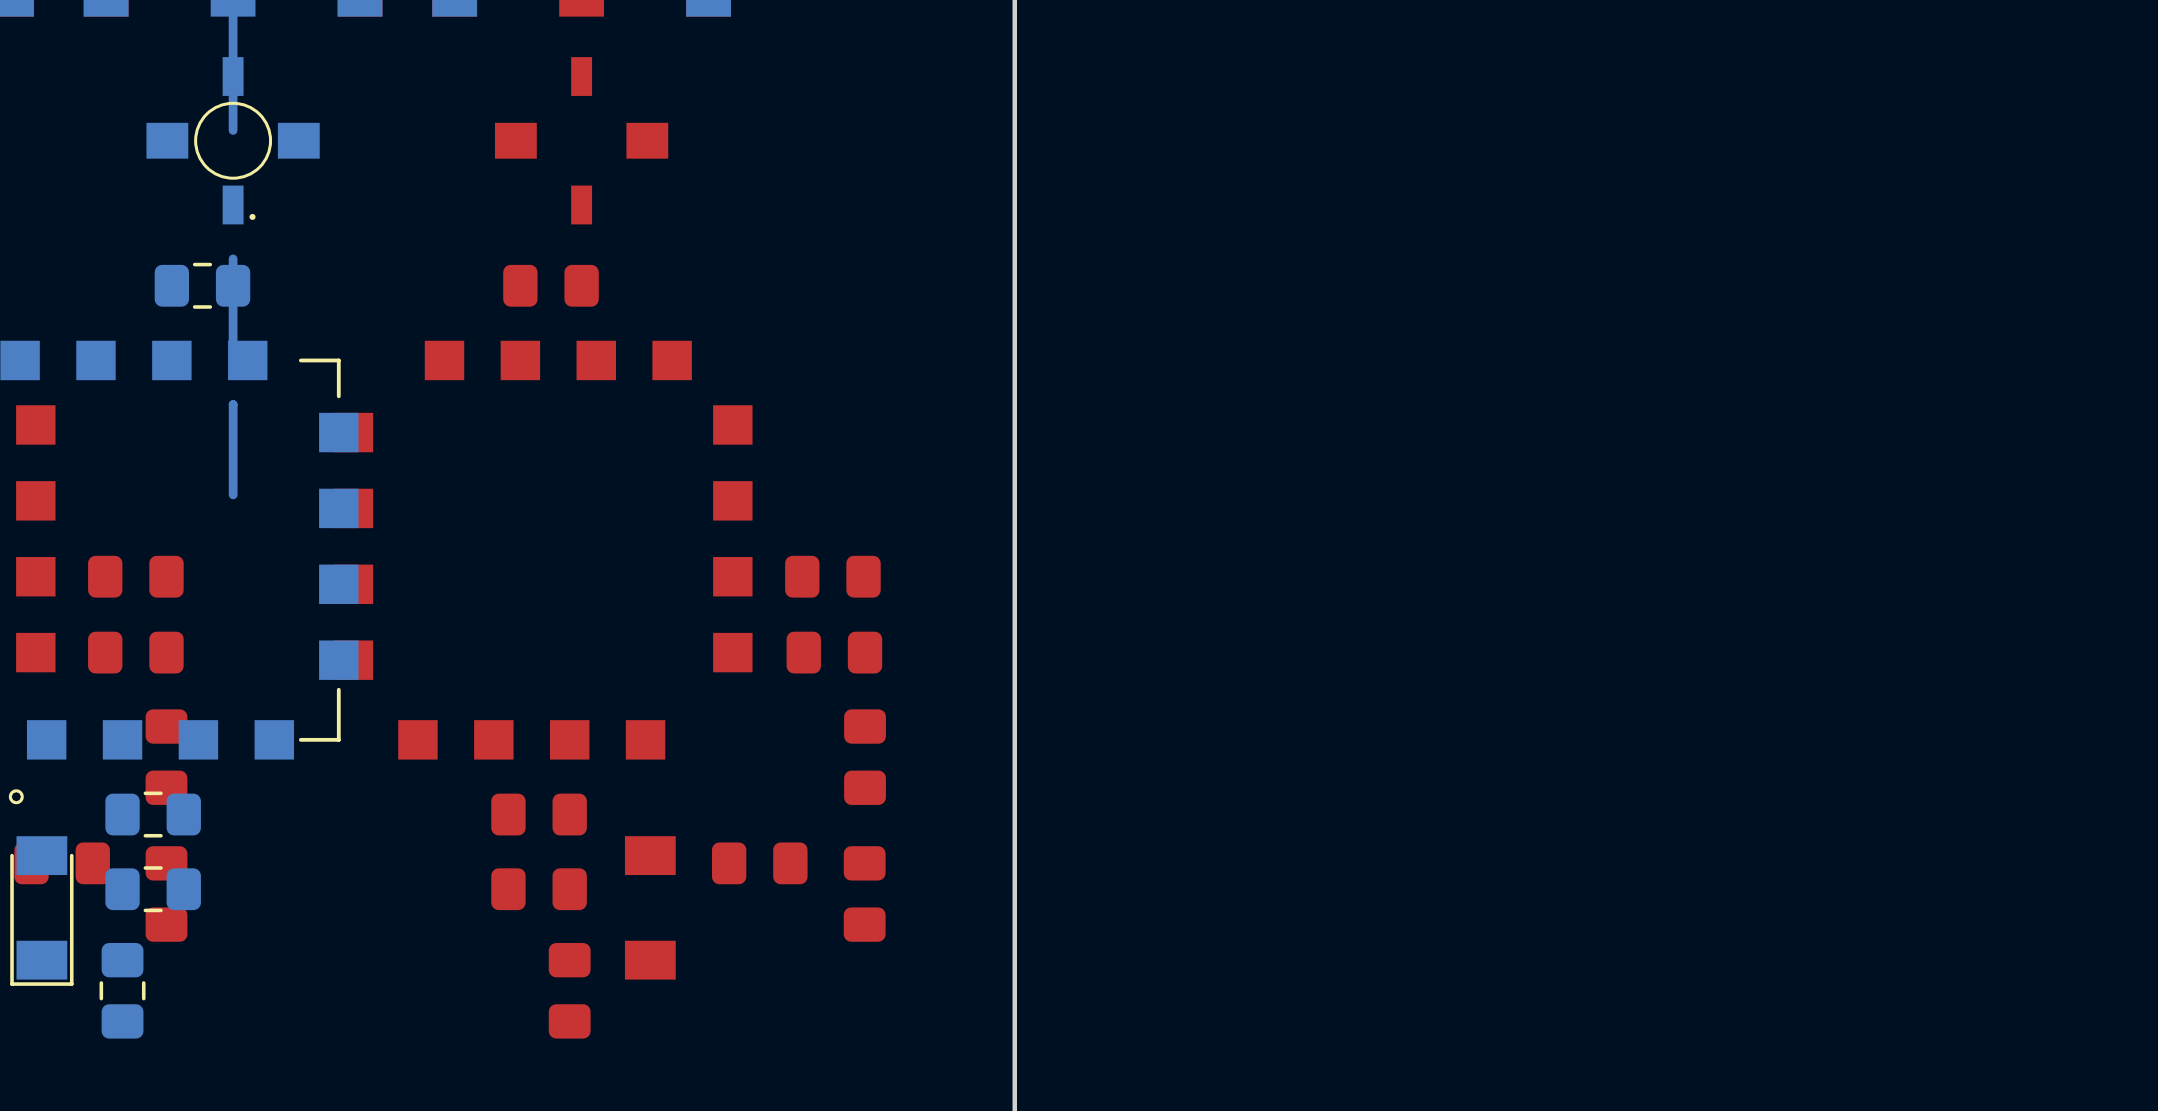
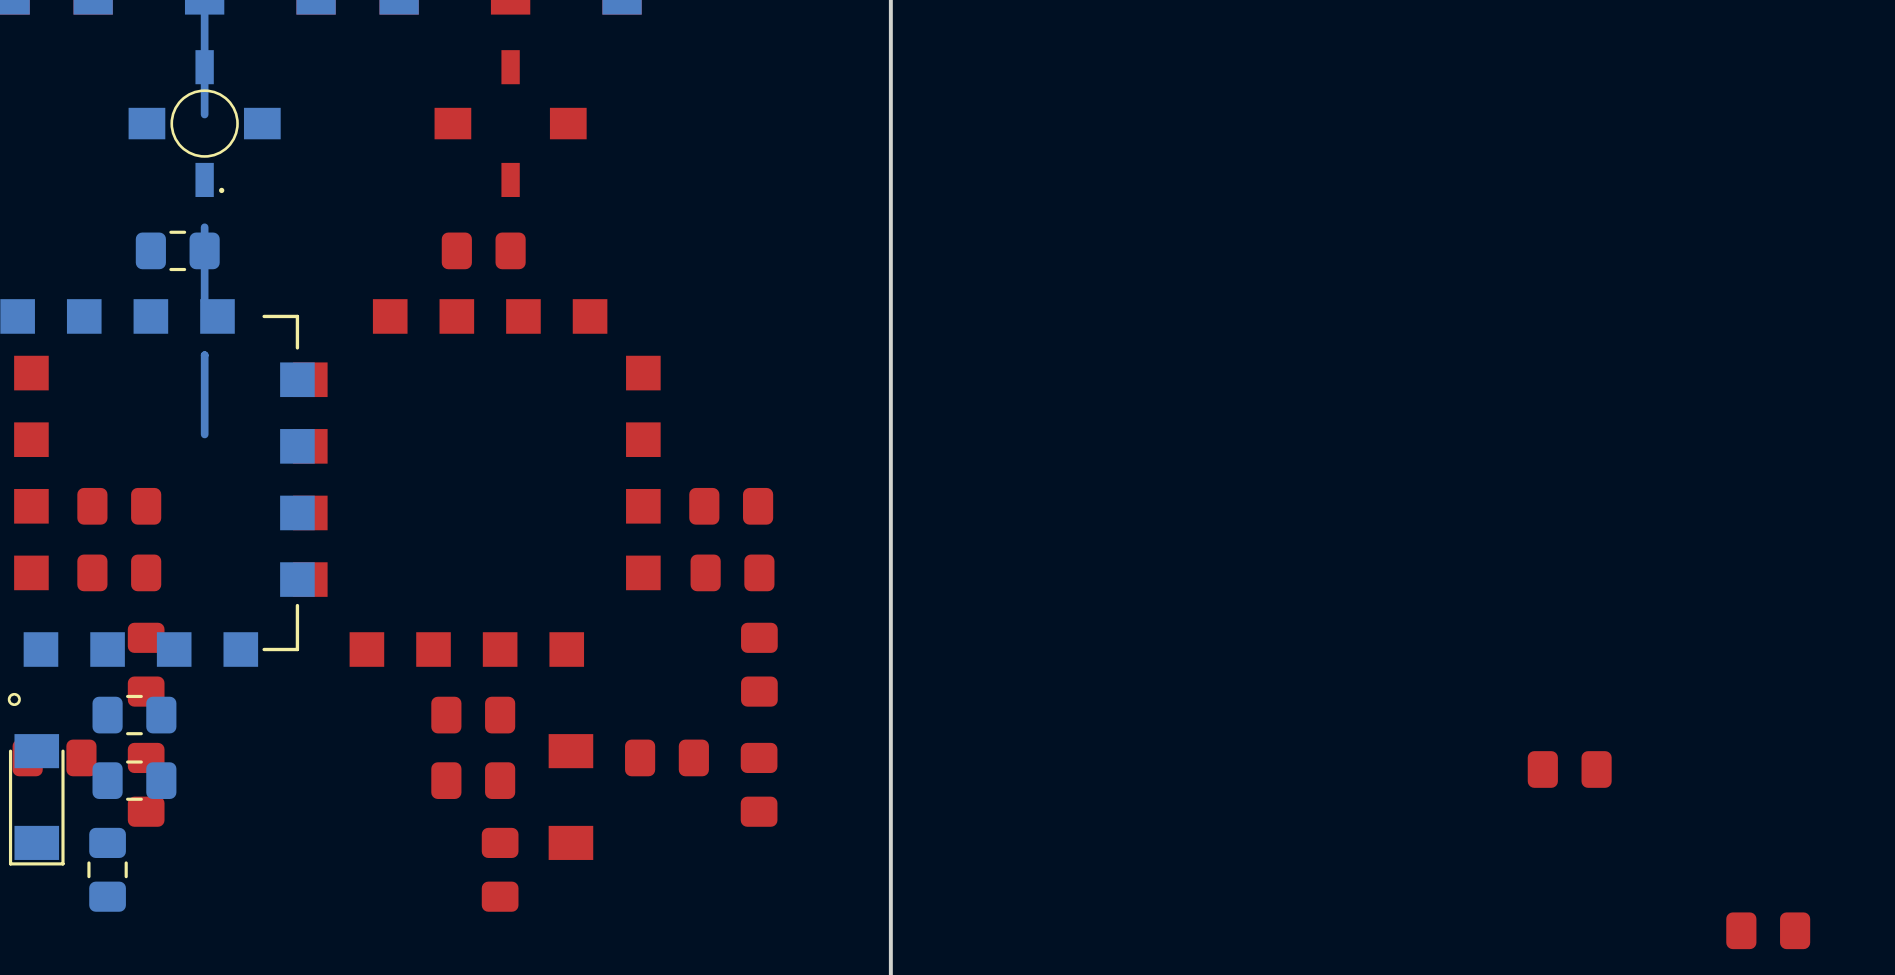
part: none -> (1569, 769)
part: none -> (1768, 930)

